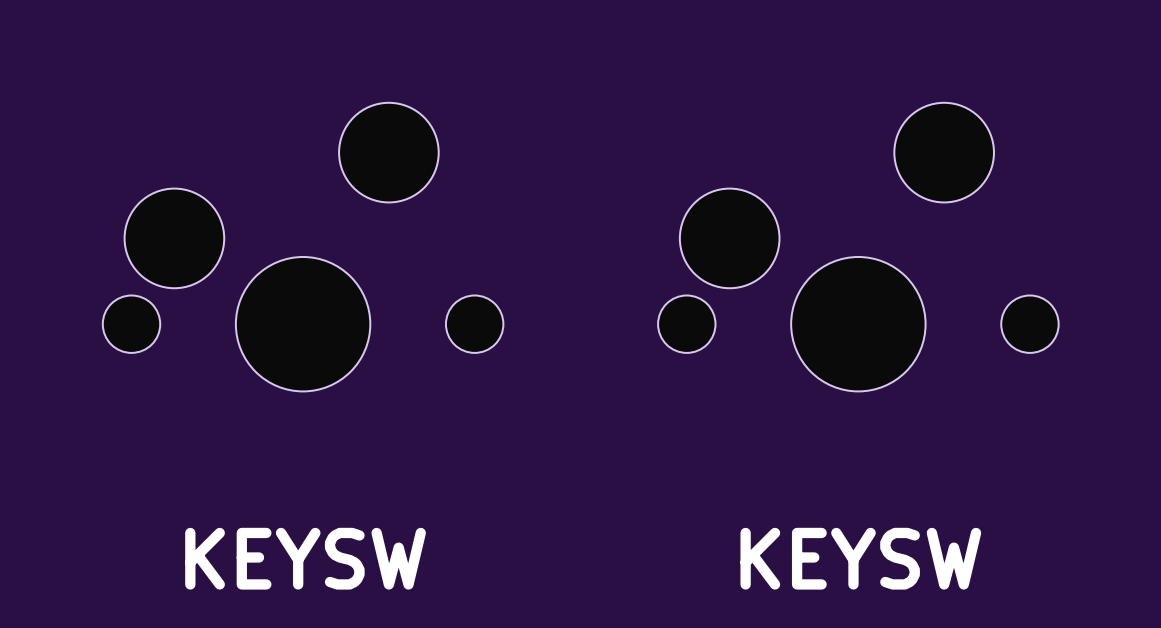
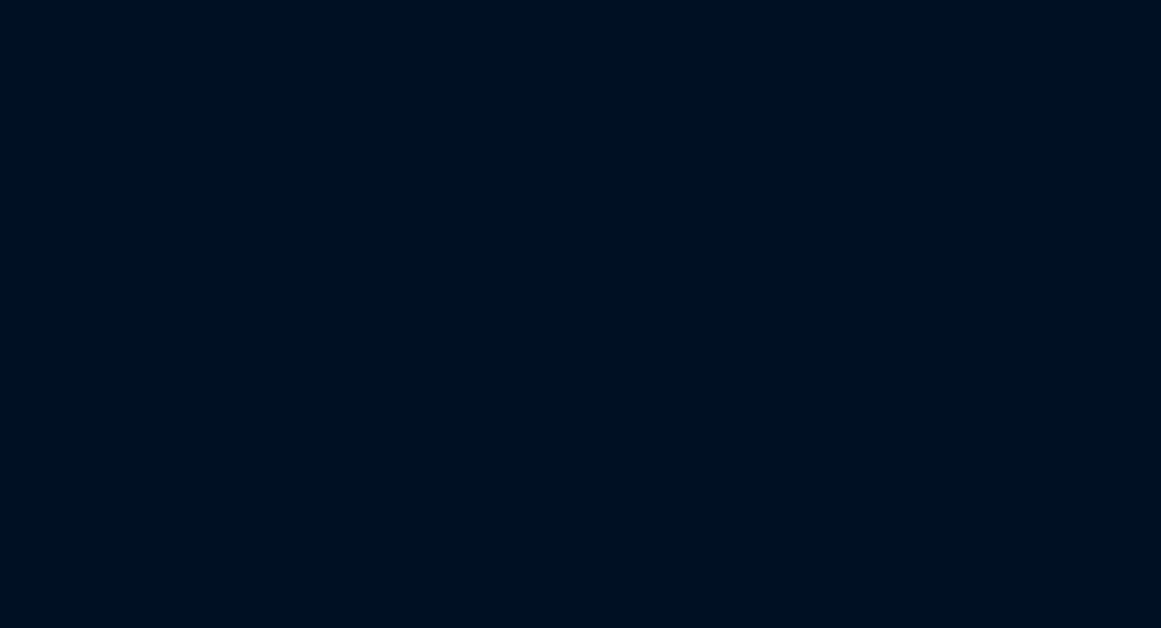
part: KEYSW (303, 247) -> none
part: KEYSW (858, 247) -> none

